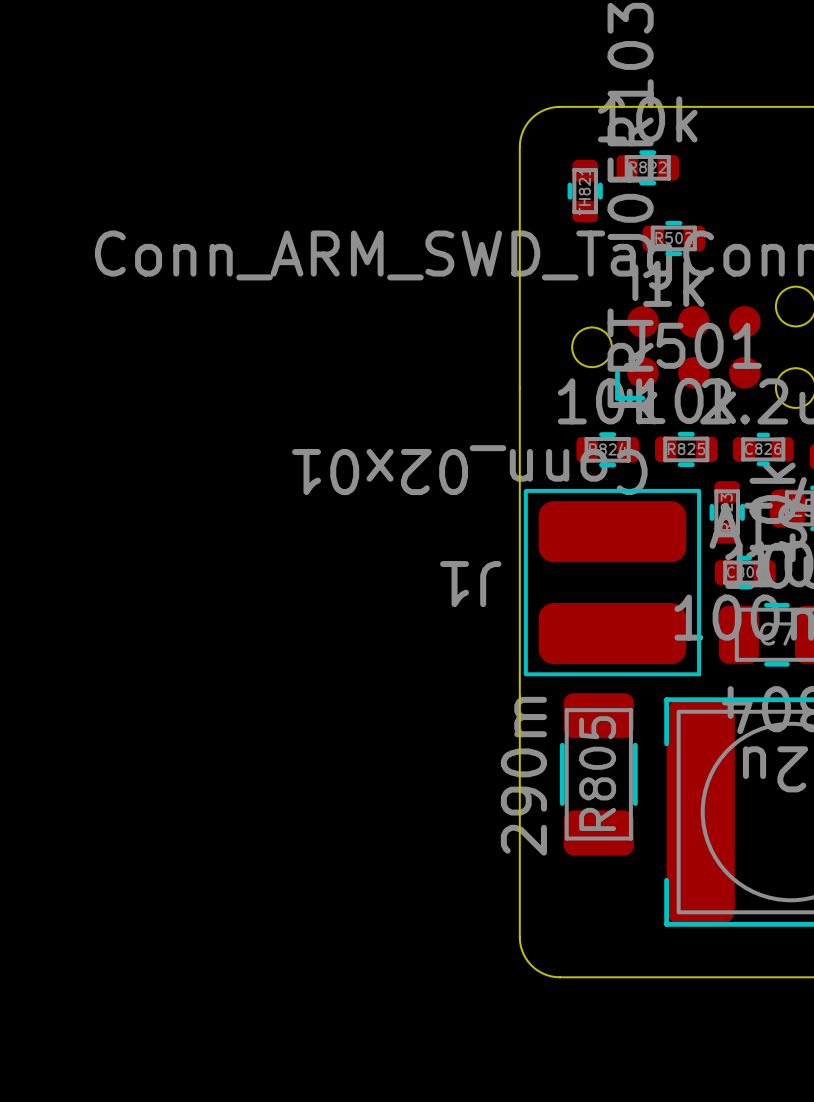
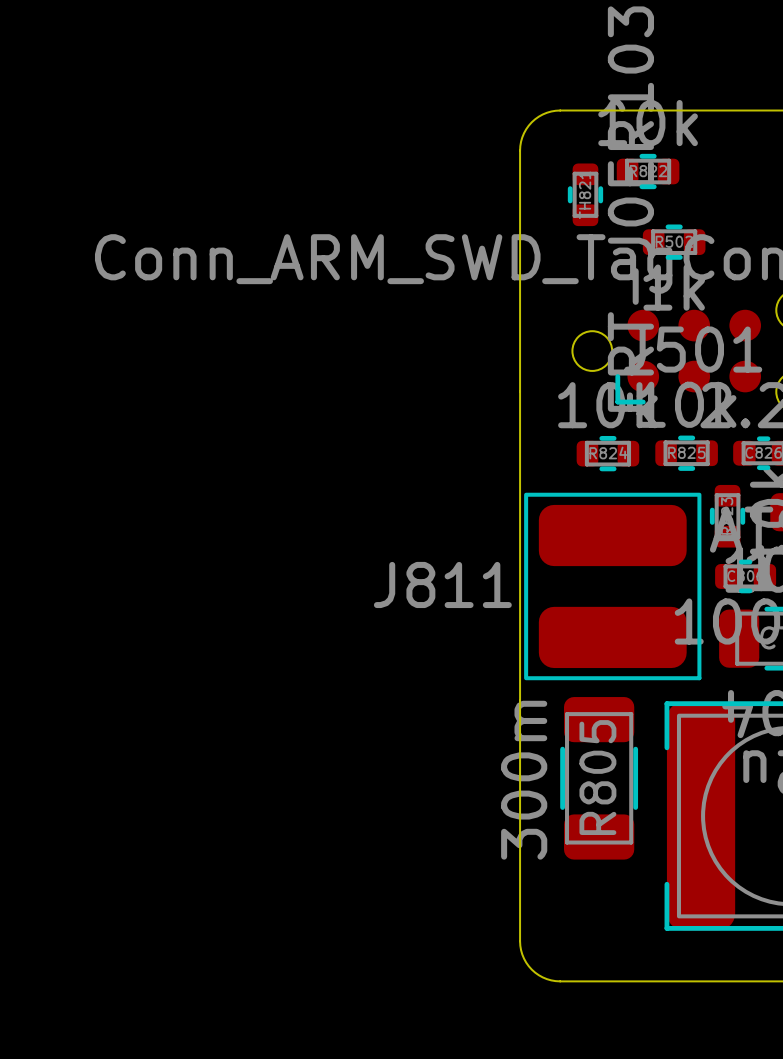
J1 value: Conn_02x01 (469, 470) -> none
J1 name: J1 (470, 584) -> J811 (442, 584)
R805 value: 290m (523, 776) -> 300m (524, 780)

